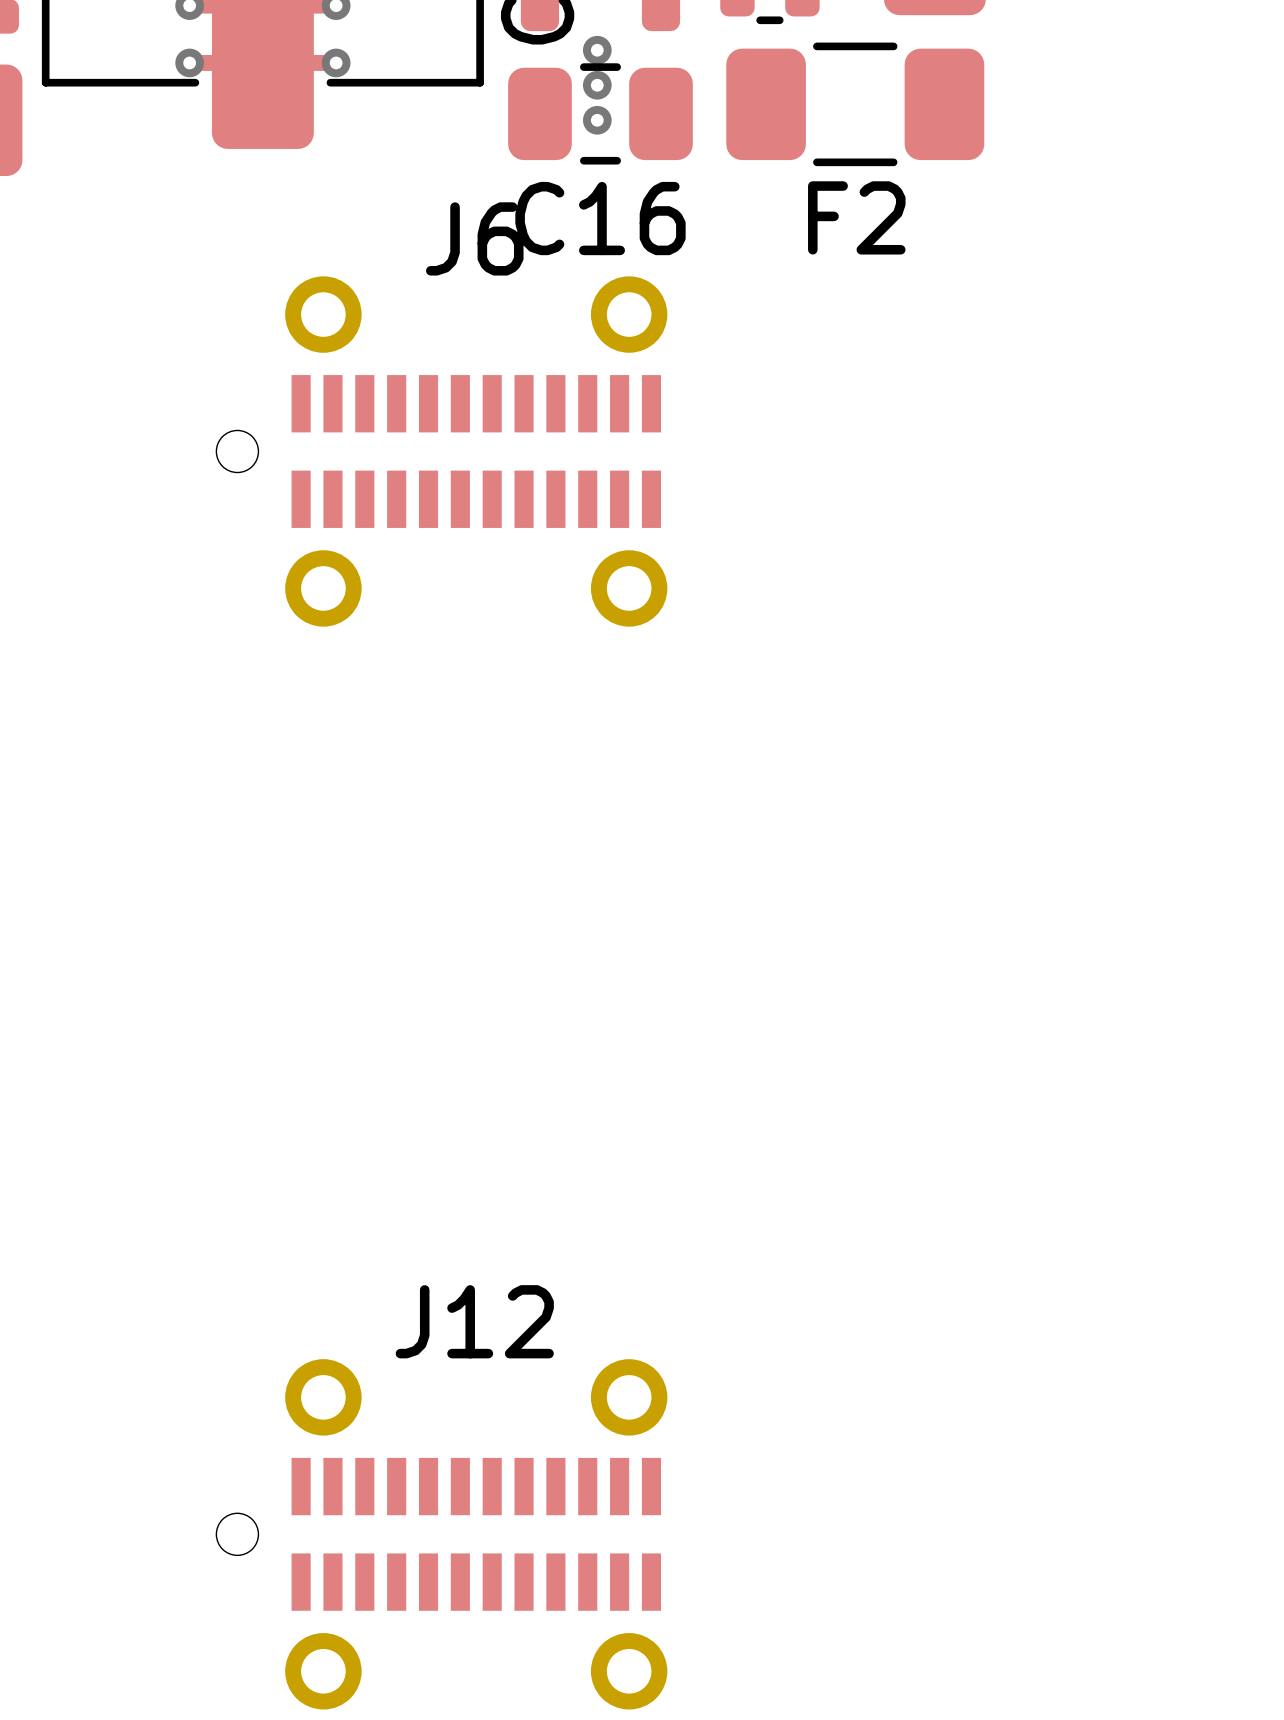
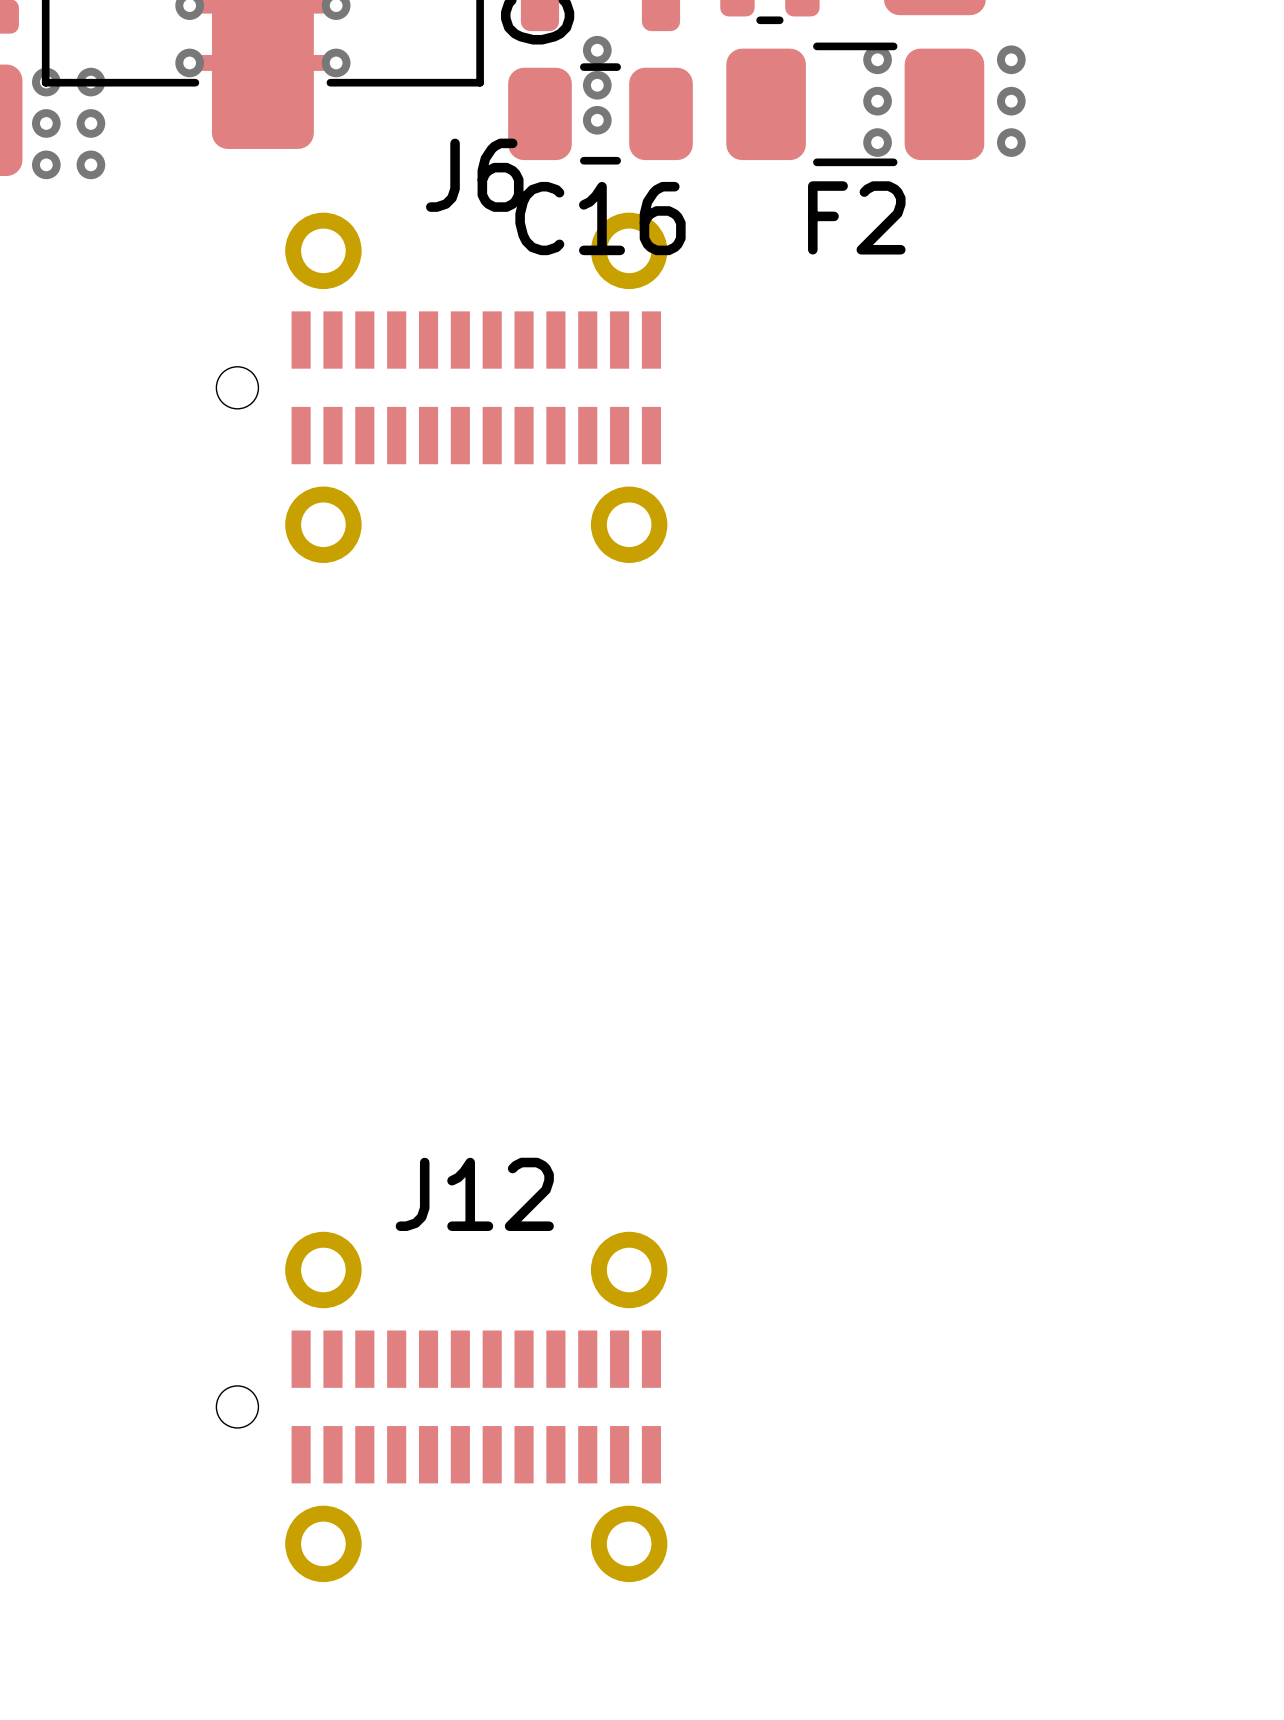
via: none -> (877, 59)
via: none -> (1011, 59)
via: none -> (46, 82)
via: none -> (90, 82)
via: none -> (877, 101)
via: none -> (1011, 101)
via: none -> (46, 123)
via: none -> (90, 123)
via: none -> (877, 142)
via: none -> (1011, 142)
via: none -> (46, 164)
via: none -> (90, 164)
J6 position: (481, 451) -> (481, 387)
J12 position: (481, 1534) -> (481, 1406)

